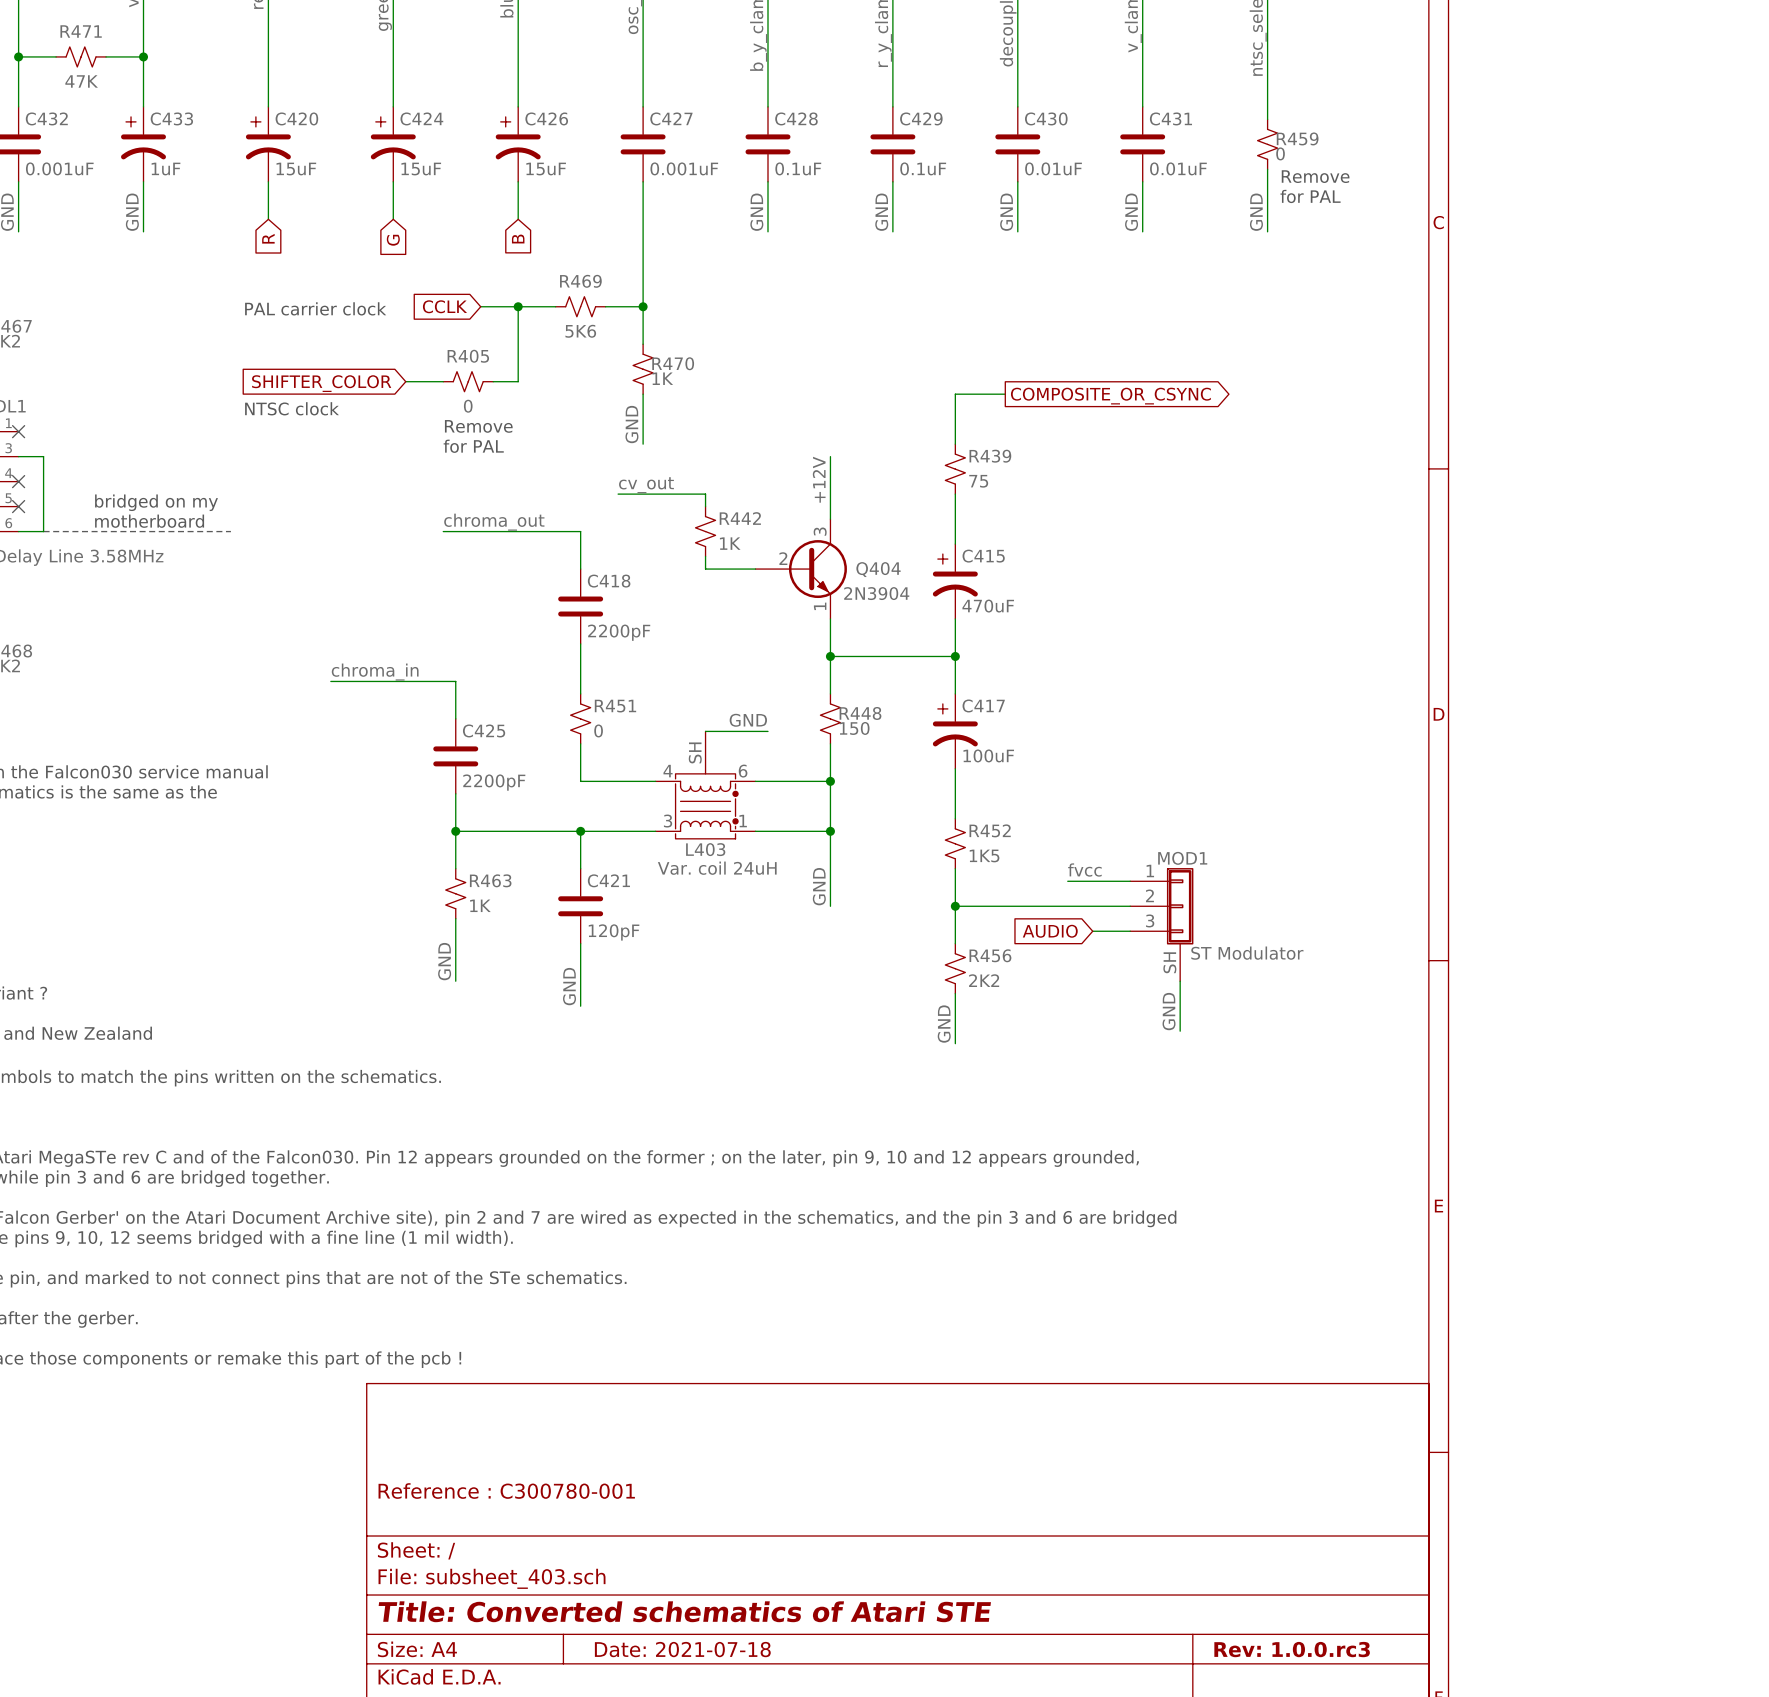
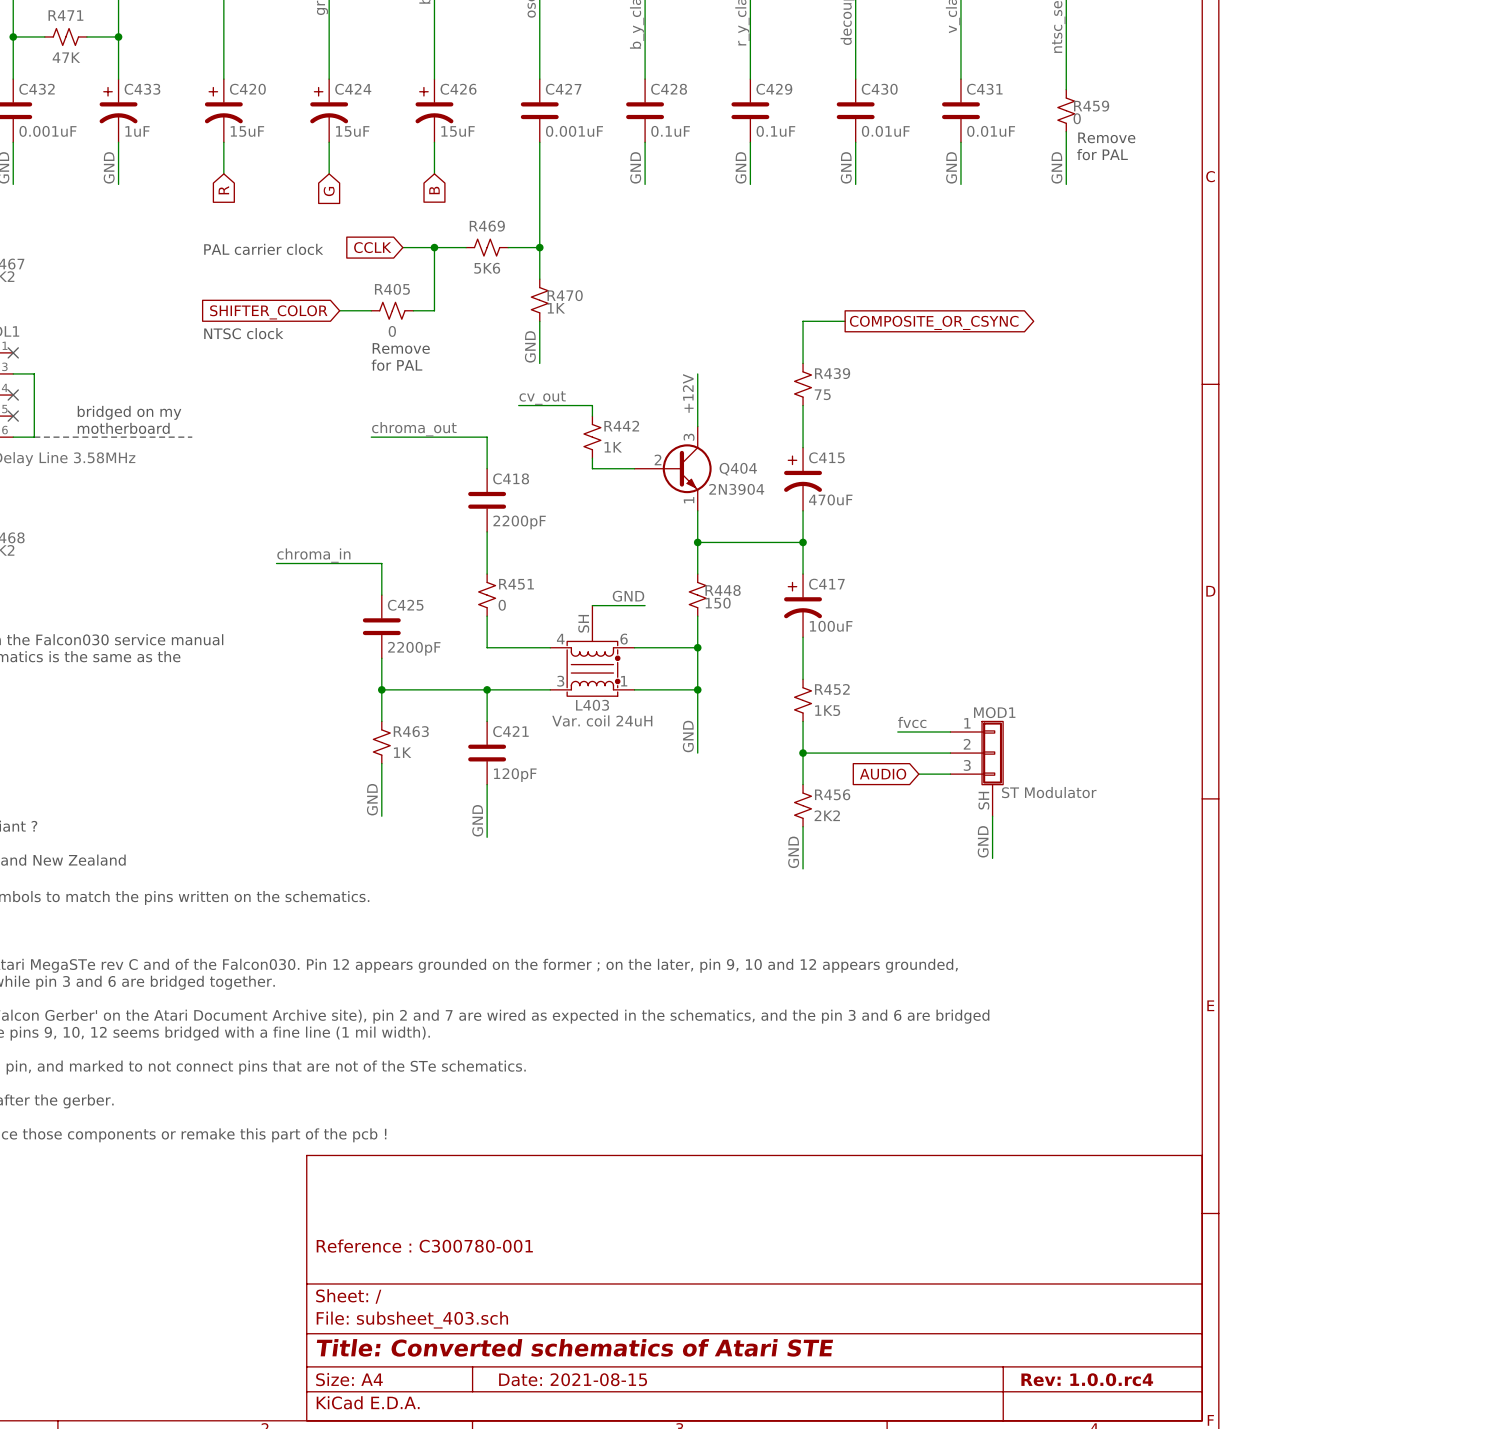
title block: Date: 2021-07-18 (682, 1649) -> Date: 2021-08-15 (573, 1379)
title block: Rev: 1.0.0.rc3 (1292, 1649) -> Rev: 1.0.0.rc4 (1087, 1379)

